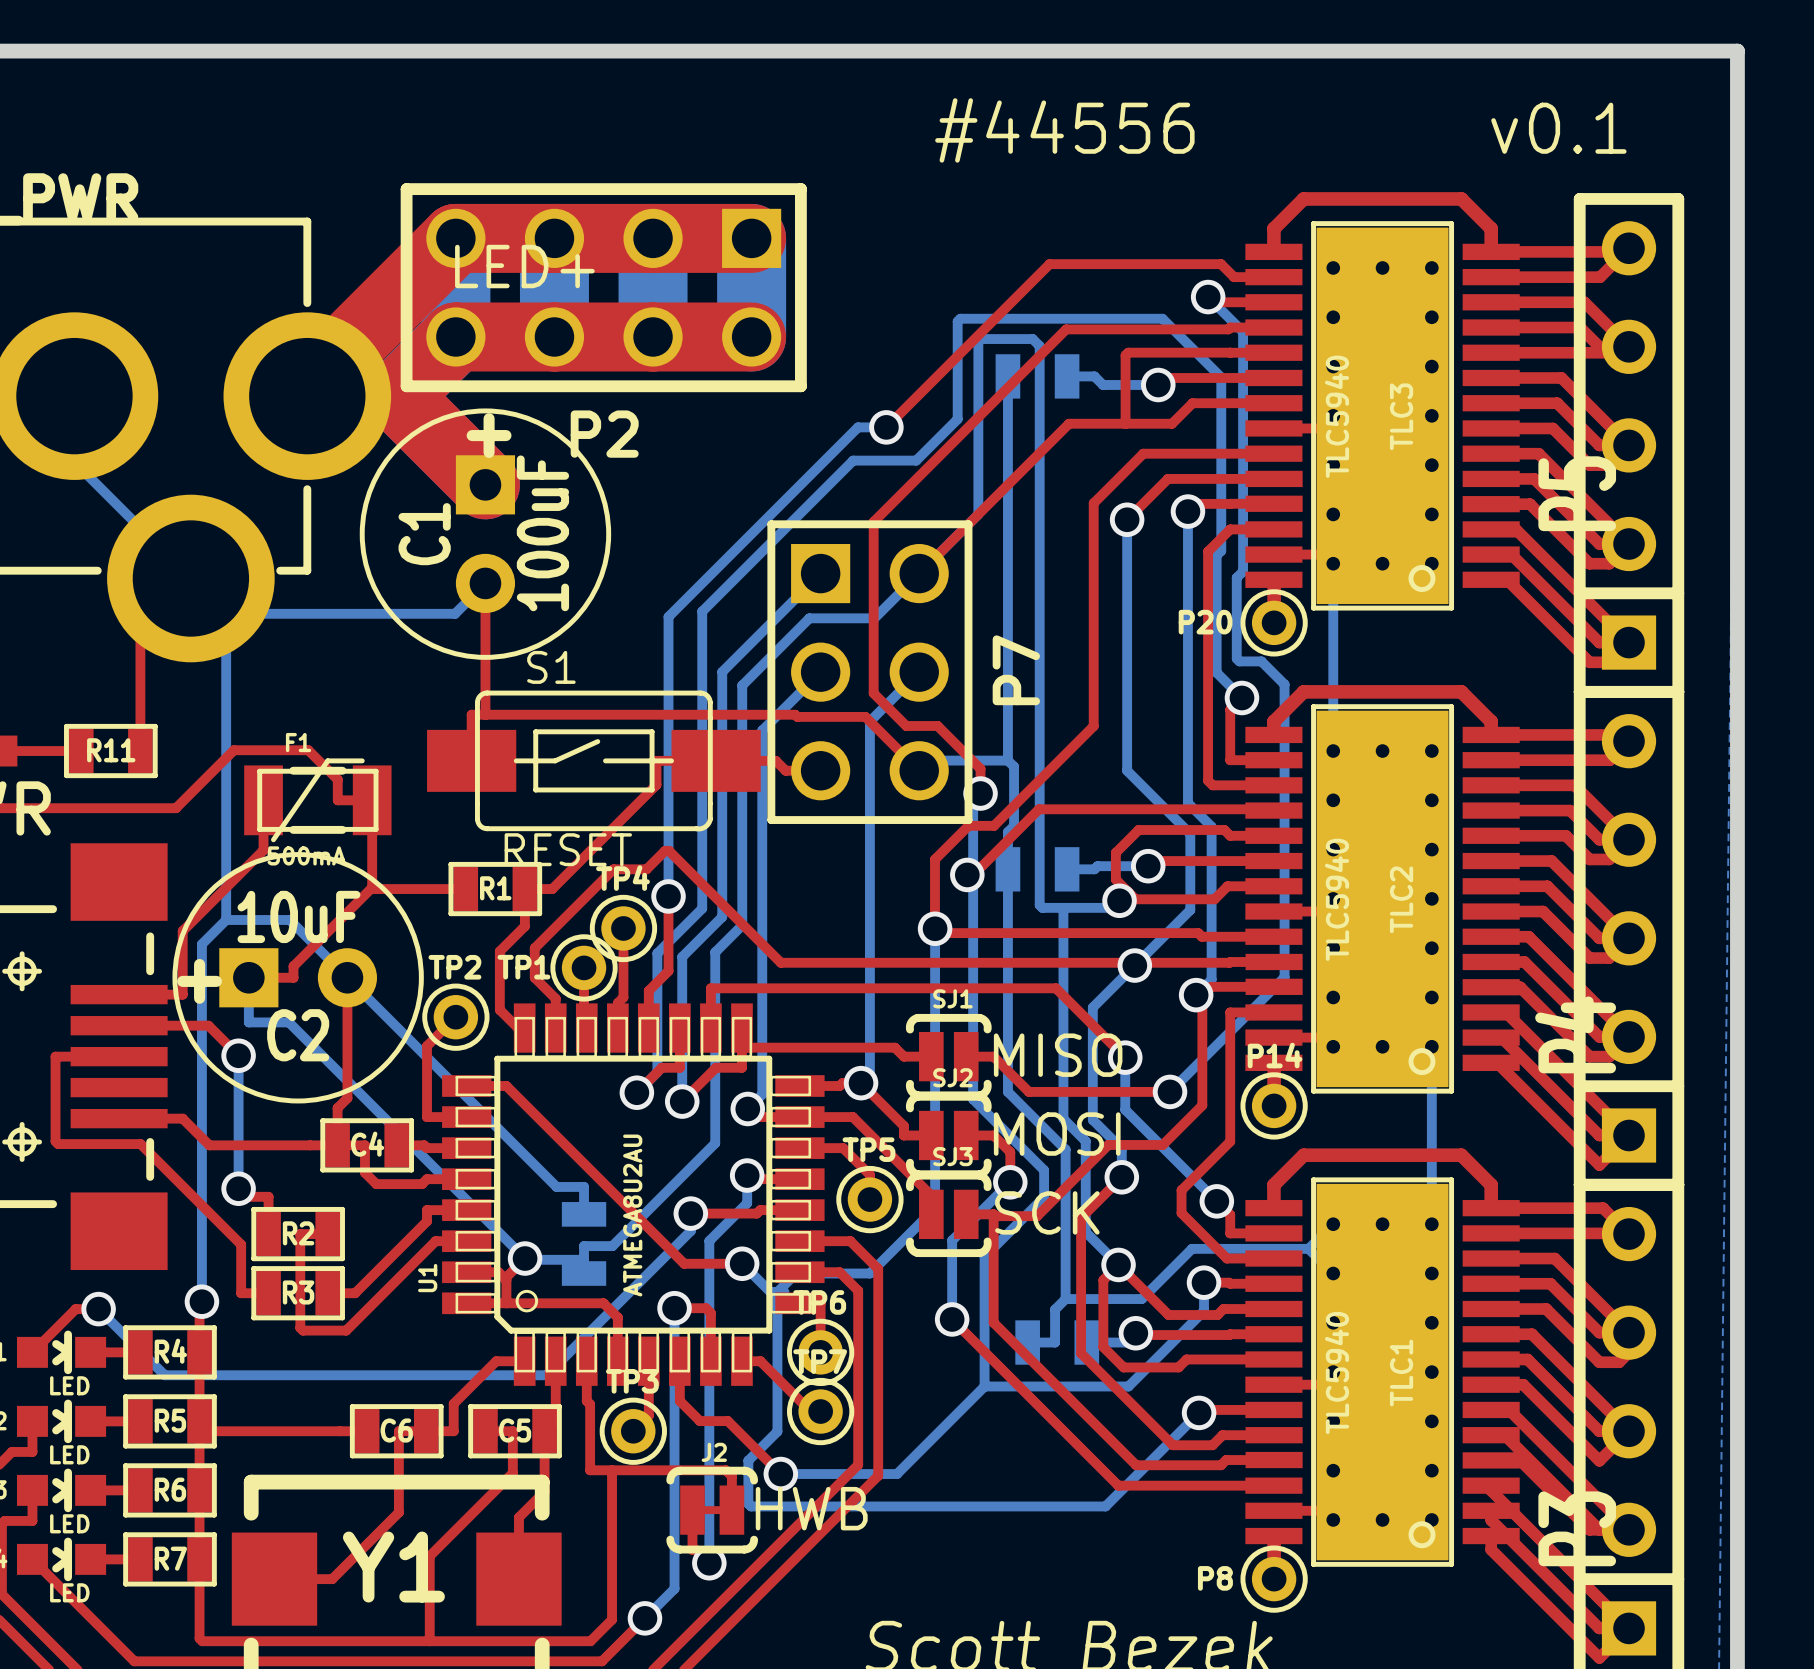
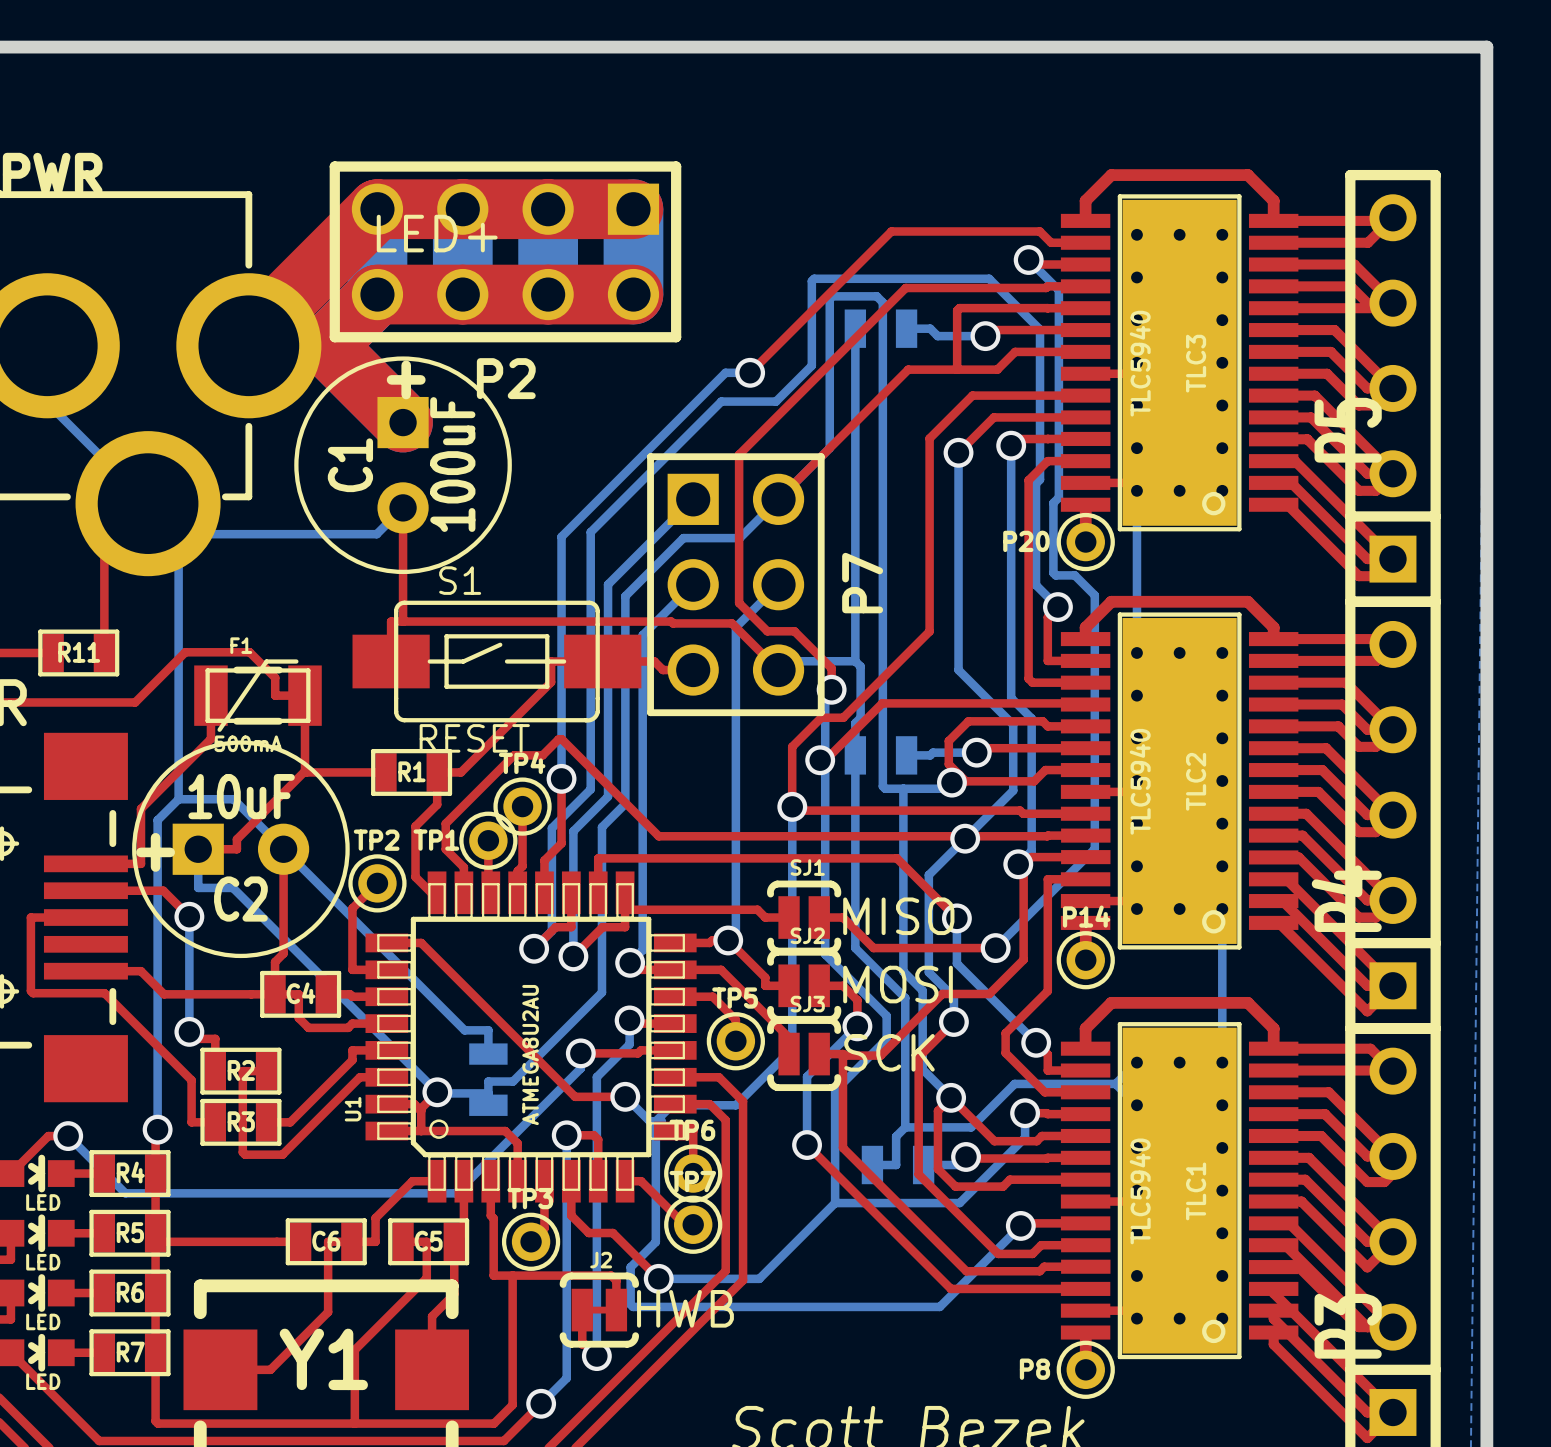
text: v0.1 (1558, 128) -> none
text: #44556 (1064, 130) -> none

